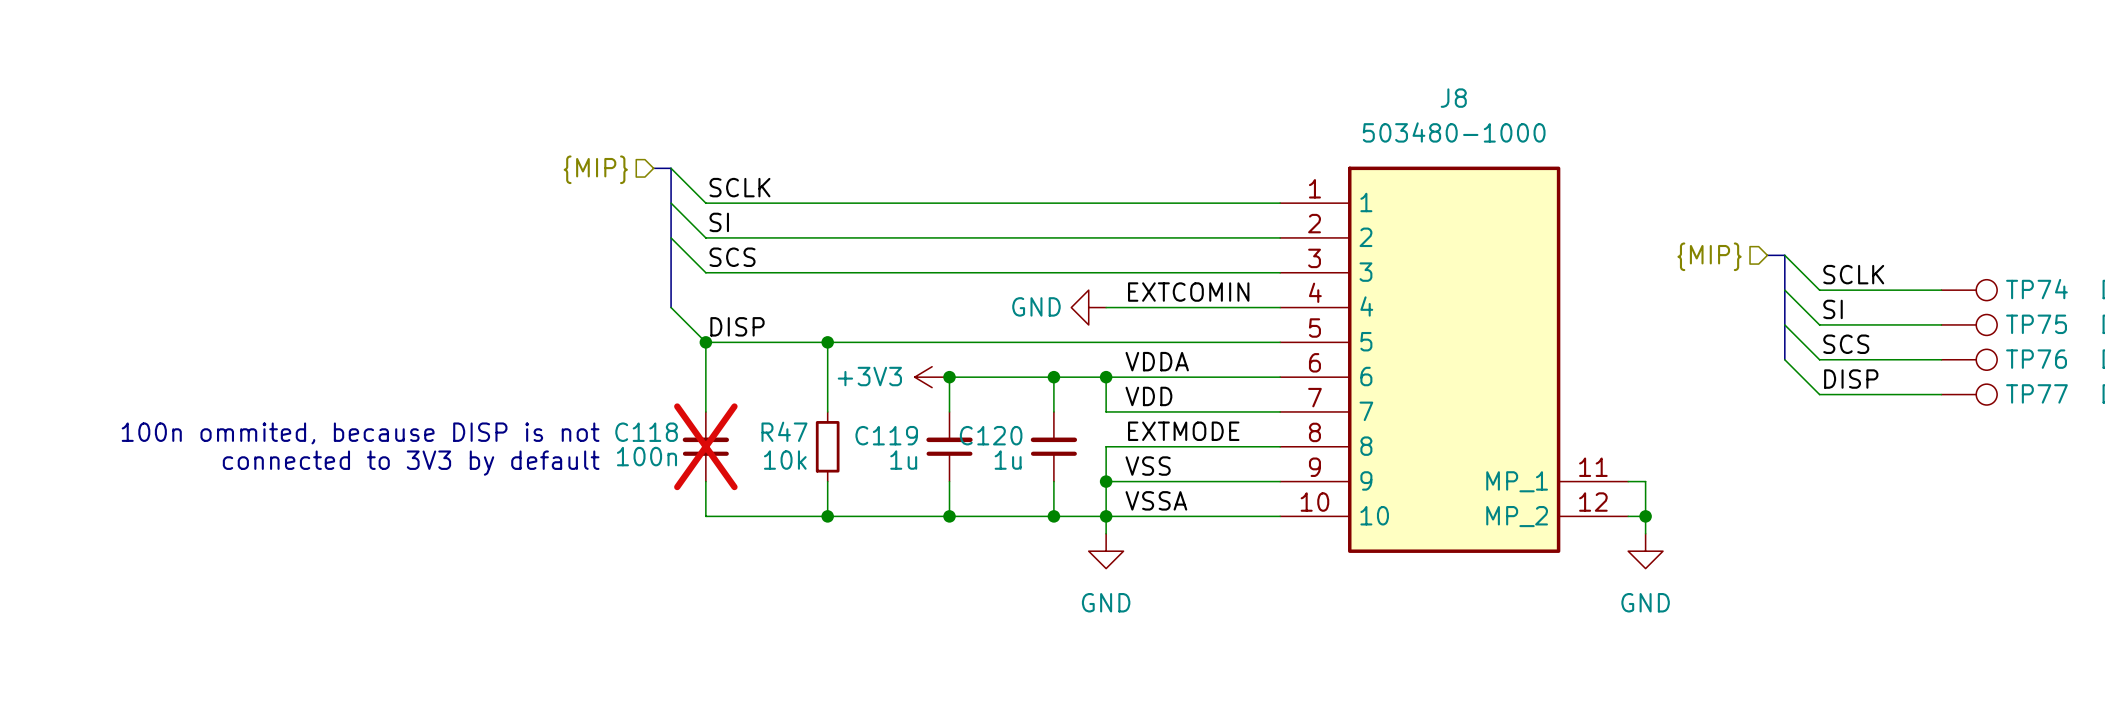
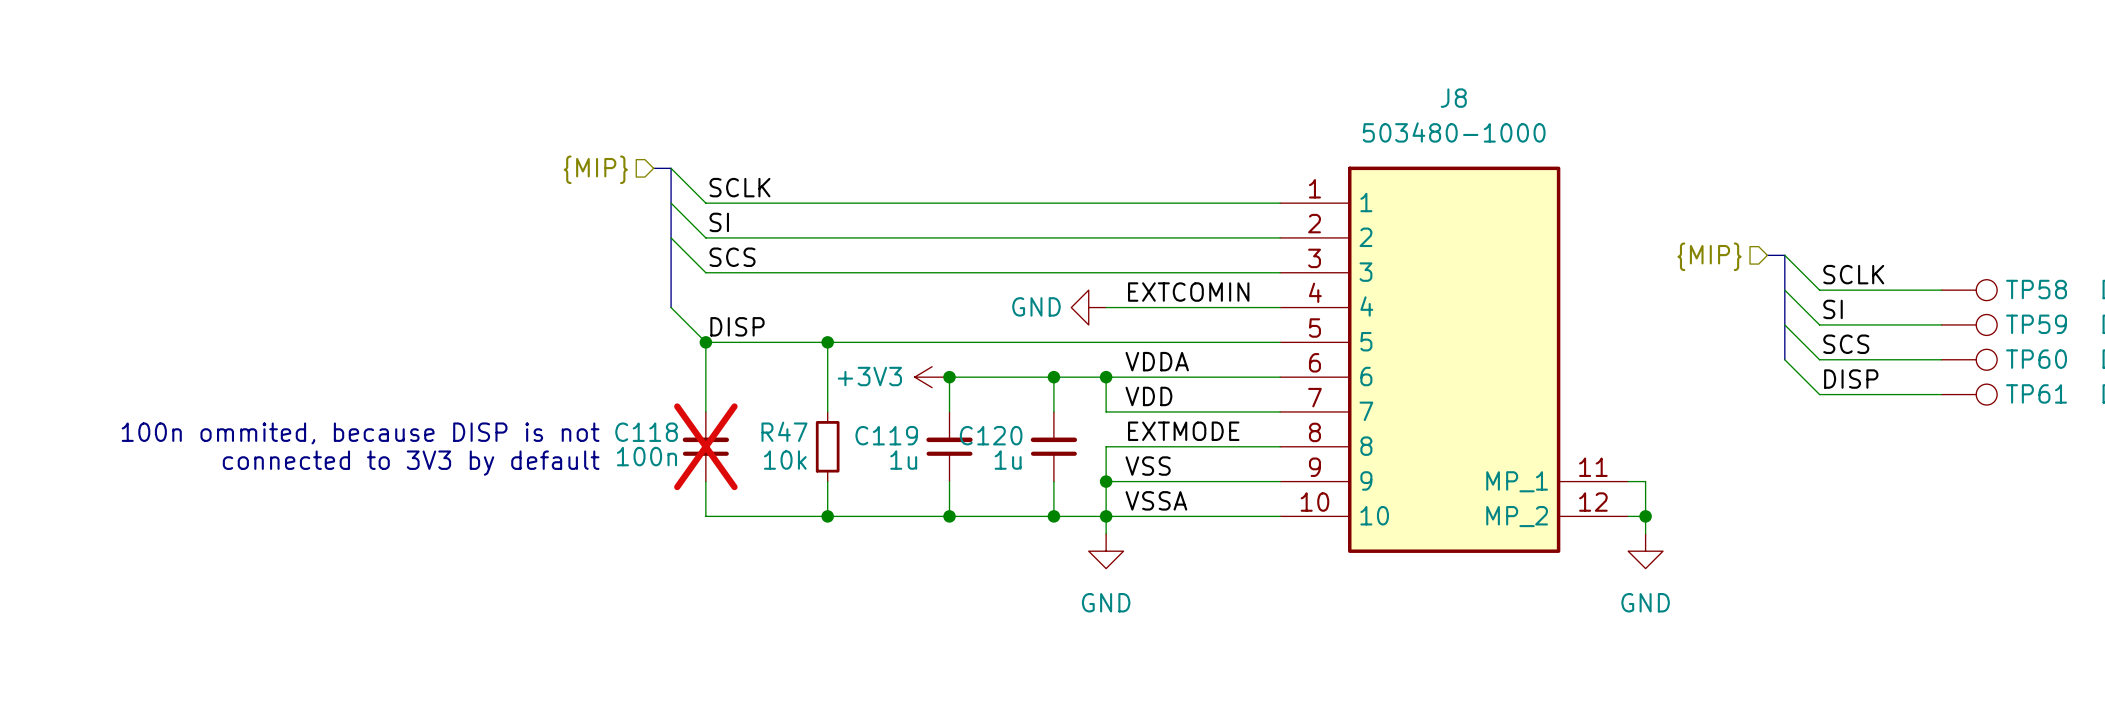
TP74 name: TP74 (2036, 289) -> TP58 (2036, 289)
TP75 name: TP75 (2036, 324) -> TP59 (2036, 324)
TP76 name: TP76 (2036, 359) -> TP60 (2036, 359)
TP77 name: TP77 (2036, 393) -> TP61 (2036, 393)

